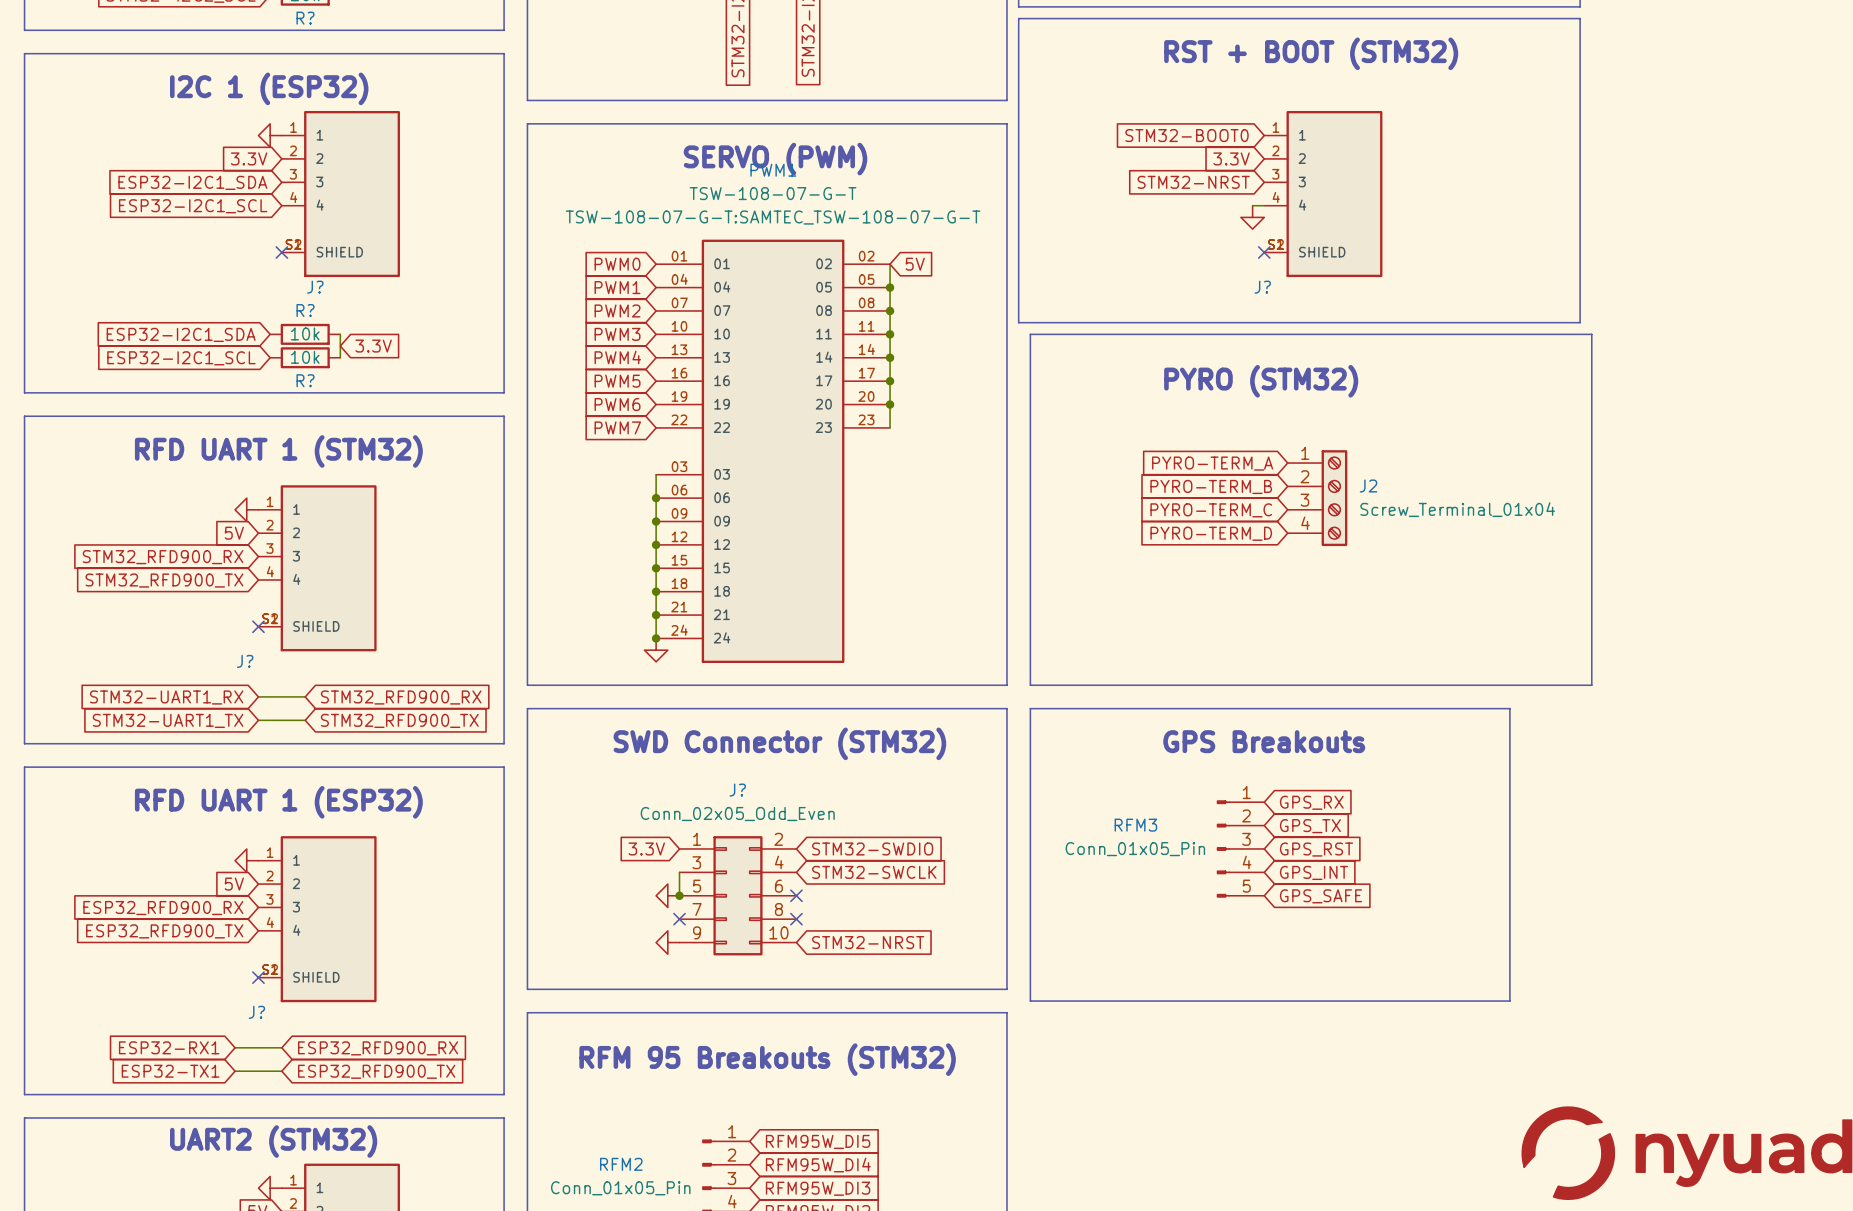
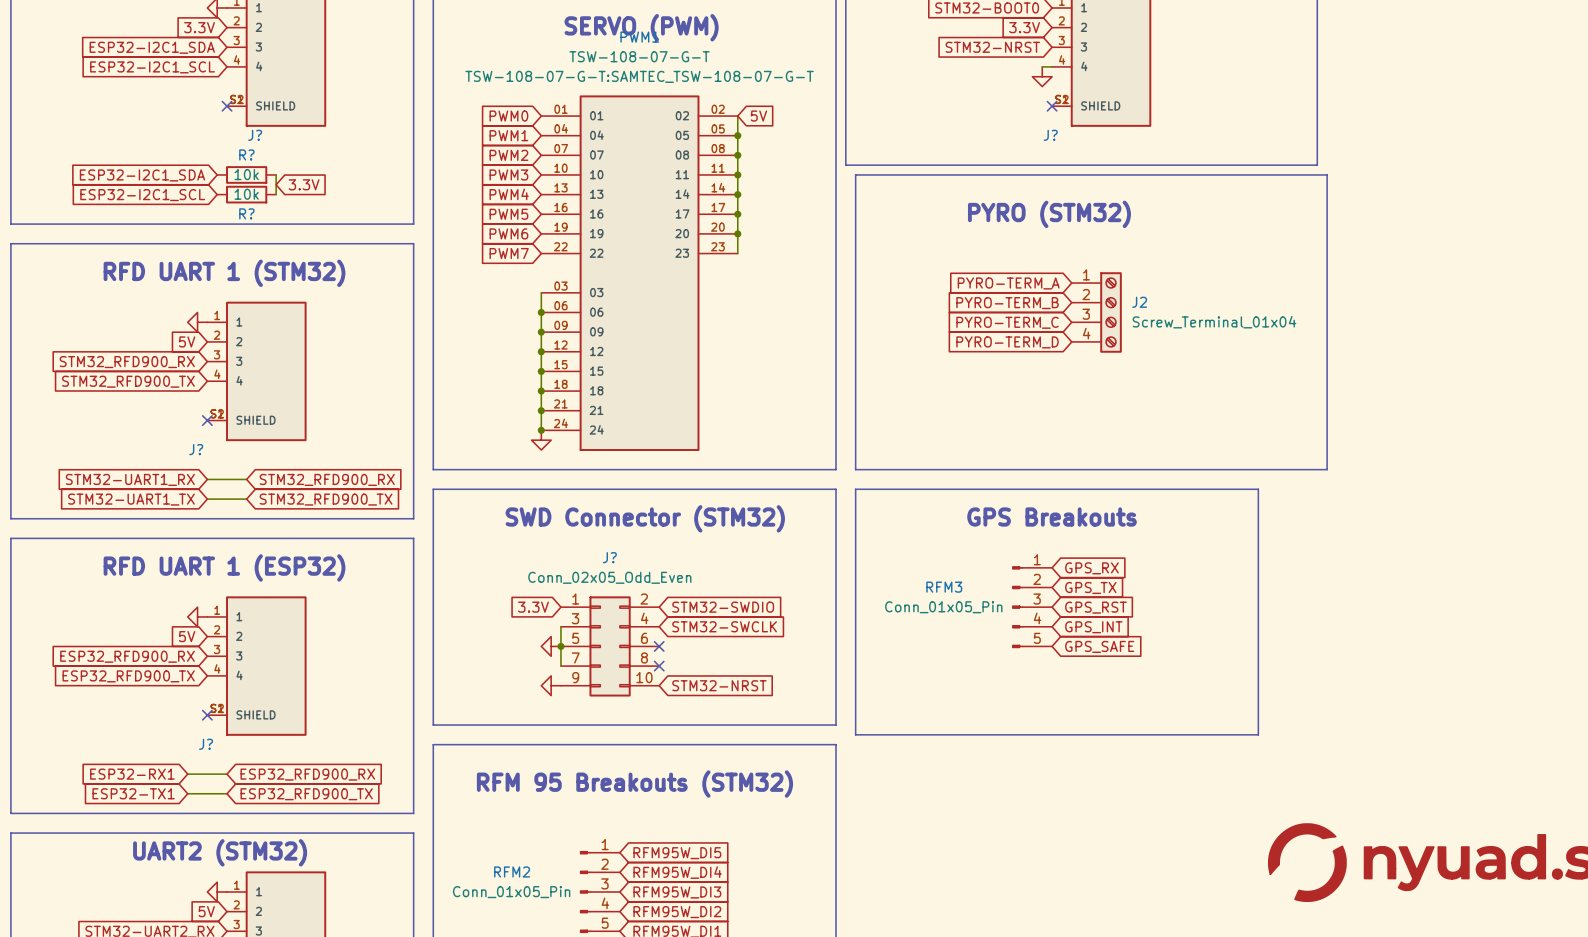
wire: none -> (560, 646) (560, 666)
no-connect mark: (679, 919) -> none

